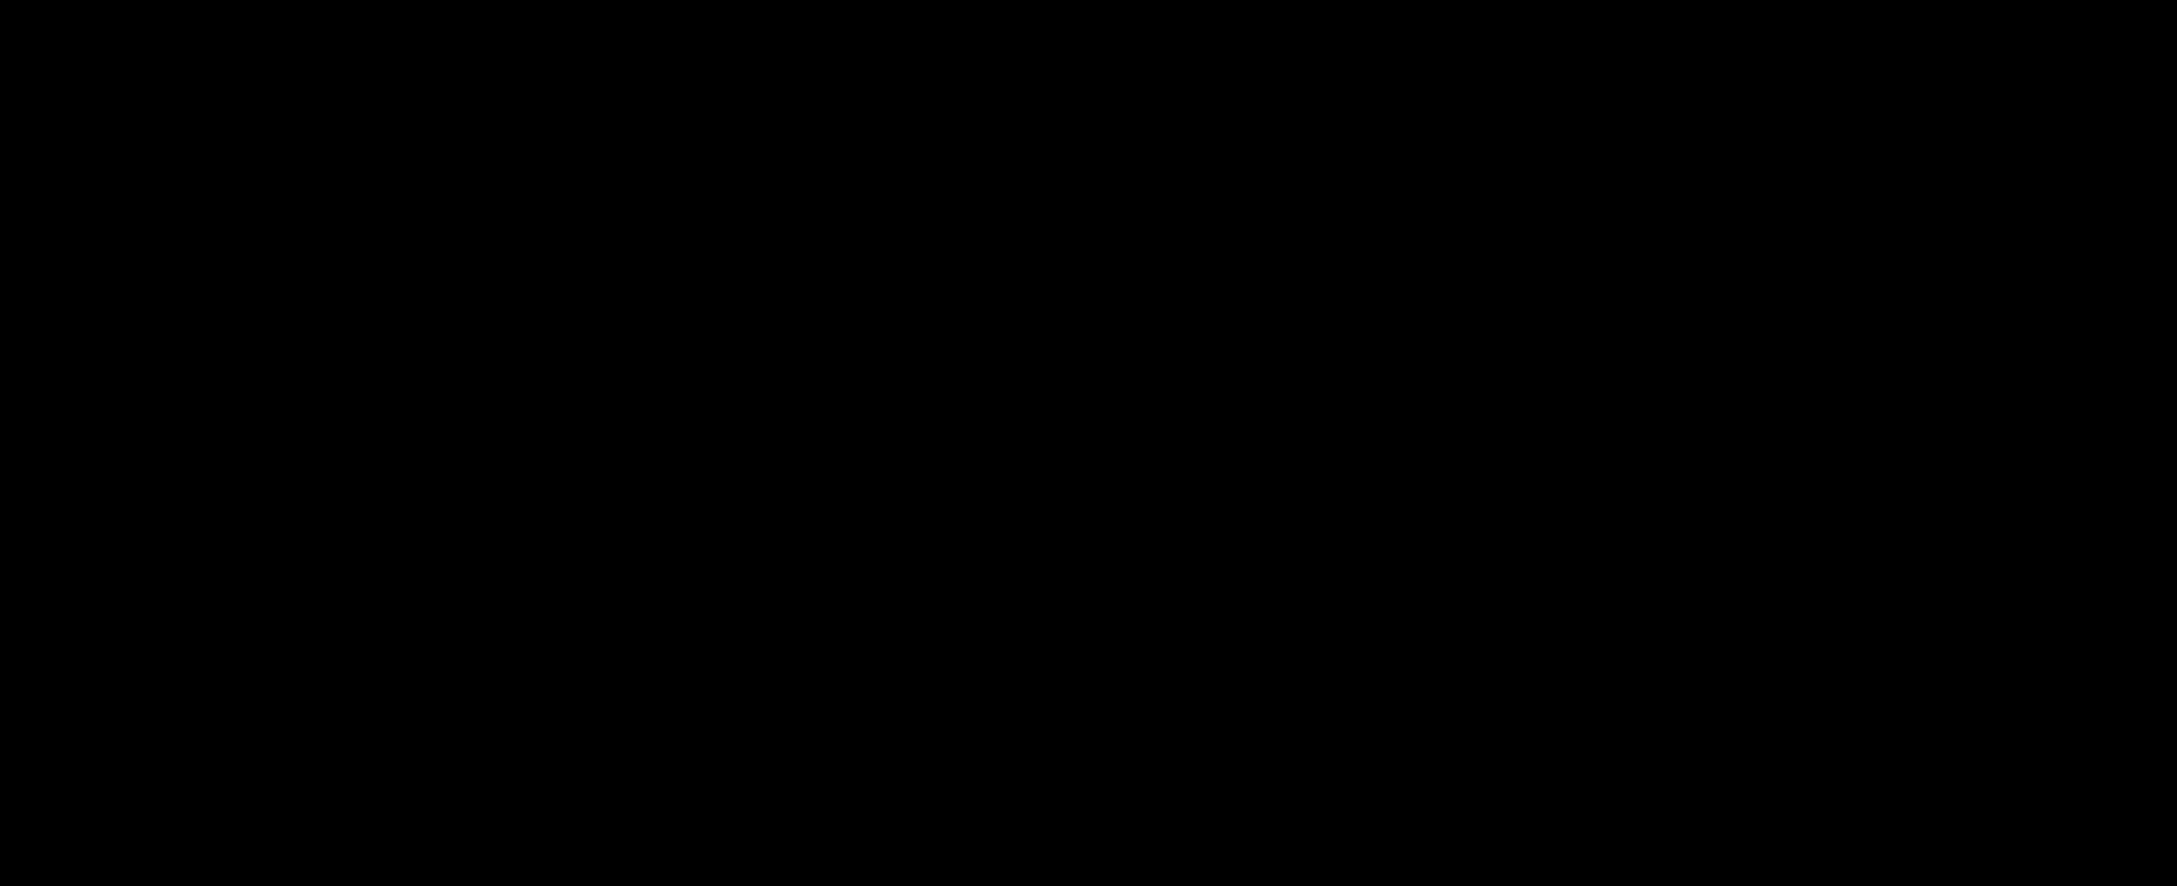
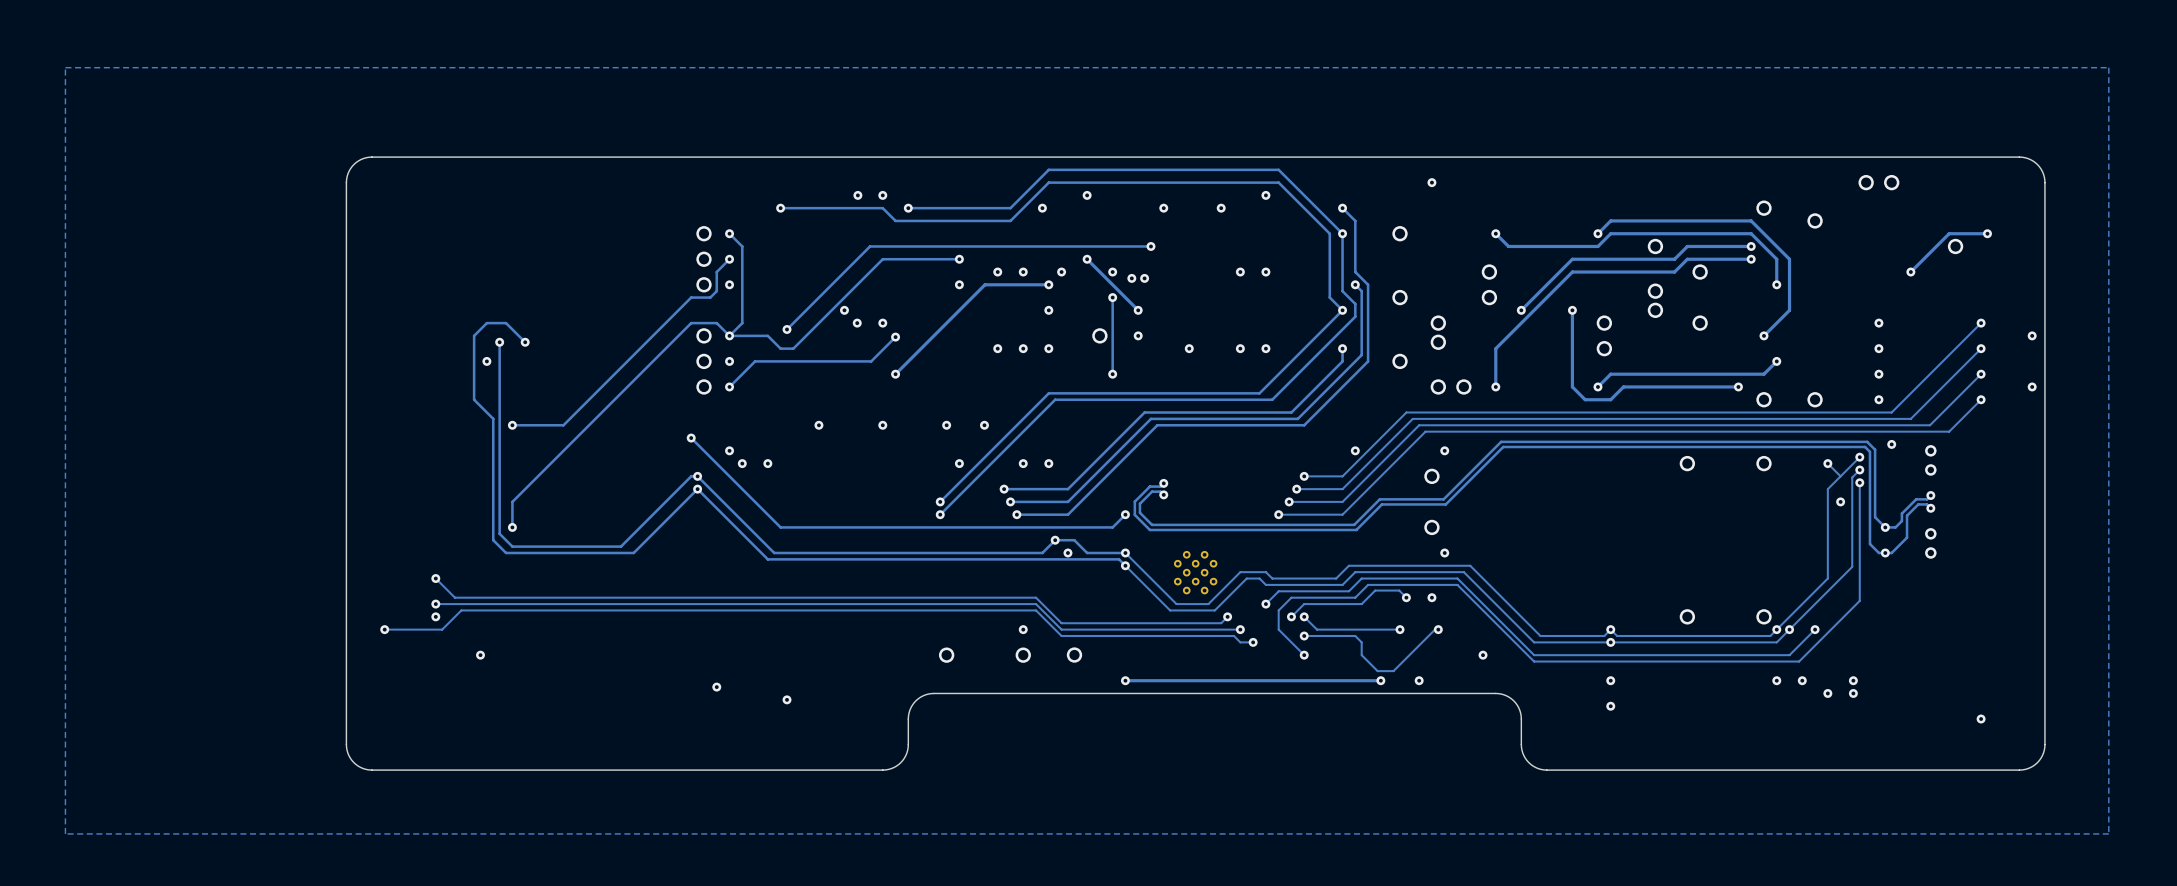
zone outline: none -> (2108, 67) (2108, 833) (65, 833) (65, 67) (2108, 67)
board edge: none -> (2019, 157) (363, 158) (351, 166) (346, 182) (347, 752) (356, 764) (371, 770) (882, 770) (893, 767) (904, 758) (908, 747) (909, 710) (917, 699) (931, 693) (1495, 693) (1509, 697) (1517, 705) (1521, 716) (1522, 752) (1530, 764) (1544, 769) (2027, 768) (2039, 760) (2044, 744) (2044, 182) (2043, 174) (2037, 164) (2030, 159) (2019, 157)
via: none -> (1431, 182)
via: none -> (1866, 182)
via: none -> (1891, 182)
via: none -> (857, 195)
via: none -> (882, 195)
via: none -> (1087, 195)
via: none -> (1265, 195)
track: none -> (780, 208) (882, 208) (895, 220) (1010, 220) (1048, 182) (1278, 182) (1329, 233) (1329, 297) (1342, 310) (1259, 393) (1048, 393) (940, 501)
via: none -> (780, 208)
track: none -> (908, 208) (1010, 208) (1048, 169) (1278, 169) (1342, 233) (1342, 291) (1355, 303) (1355, 316) (1272, 399) (1055, 399) (940, 514)
via: none -> (908, 208)
via: none -> (1042, 208)
via: none -> (1163, 208)
via: none -> (1221, 208)
track: none -> (1342, 208) (1355, 220) (1355, 272) (1368, 284) (1368, 361) (1304, 425) (1157, 425) (1067, 514) (1016, 514)
via: none -> (1342, 208)
via: none -> (1763, 208)
via: none -> (1815, 220)
via: none -> (703, 233)
track: none -> (729, 233) (742, 246) (742, 323) (729, 335)
via: none -> (729, 233)
via: none -> (1342, 233)
via: none -> (1400, 233)
track: none -> (1495, 233) (1508, 246) (1597, 246) (1610, 233) (1751, 233) (1776, 259) (1776, 284)
via: none -> (1495, 233)
track: none -> (1597, 233) (1610, 220) (1751, 220) (1789, 259) (1789, 310) (1763, 335)
via: none -> (1597, 233)
track: none -> (1987, 233) (1949, 233) (1910, 272)
via: none -> (1987, 233)
track: none -> (1150, 246) (870, 246) (787, 329)
via: none -> (1150, 246)
via: none -> (1655, 246)
track: none -> (1751, 246) (1687, 246) (1674, 259) (1572, 259) (1521, 310)
via: none -> (1751, 246)
via: none -> (1955, 246)
via: none -> (703, 259)
track: none -> (729, 259) (716, 272) (716, 291) (710, 297) (691, 297) (563, 425) (512, 425)
via: none -> (729, 259)
track: none -> (959, 259) (882, 259) (793, 348) (780, 348) (767, 335) (729, 335)
via: none -> (959, 259)
track: none -> (1087, 259) (1138, 310)
via: none -> (1087, 259)
track: none -> (1751, 259) (1687, 259) (1674, 272) (1572, 272) (1495, 348) (1495, 386)
via: none -> (1751, 259)
via: none -> (997, 272)
via: none -> (1023, 272)
via: none -> (1061, 272)
via: none -> (1112, 272)
via: none -> (1240, 272)
via: none -> (1265, 272)
via: none -> (1489, 272)
via: none -> (1700, 272)
via: none -> (1910, 272)
via: none -> (1131, 278)
via: none -> (1144, 278)
via: none -> (703, 284)
via: none -> (729, 284)
via: none -> (959, 284)
track: none -> (1048, 284) (984, 284) (895, 374)
via: none -> (1048, 284)
track: none -> (1355, 284) (1361, 291) (1361, 355) (1297, 418) (1150, 418) (1067, 501) (1010, 501)
via: none -> (1355, 284)
via: none -> (1776, 284)
via: none -> (1655, 291)
track: none -> (1112, 297) (1112, 374)
via: none -> (1112, 297)
via: none -> (1400, 297)
via: none -> (1489, 297)
via: none -> (844, 310)
via: none -> (1048, 310)
via: none -> (1138, 310)
via: none -> (1342, 310)
via: none -> (1521, 310)
track: none -> (1572, 310) (1572, 386) (1585, 399) (1610, 399) (1623, 386) (1738, 386)
via: none -> (1572, 310)
via: none -> (1655, 310)
via: none -> (857, 323)
via: none -> (882, 323)
via: none -> (1438, 323)
via: none -> (1604, 323)
via: none -> (1700, 323)
via: none -> (1878, 323)
track: none -> (1981, 323) (1891, 412) (1406, 412) (1342, 476) (1304, 476)
via: none -> (1981, 323)
via: none -> (787, 329)
via: none -> (703, 335)
track: none -> (729, 335) (716, 323) (691, 323) (512, 501) (512, 527)
via: none -> (729, 335)
via: none -> (1099, 335)
via: none -> (1138, 335)
via: none -> (1763, 335)
via: none -> (2032, 335)
track: none -> (895, 337) (871, 361) (755, 361) (729, 386)
via: none -> (895, 337)
track: none -> (499, 342) (499, 533) (512, 546) (620, 546) (691, 476) (697, 476) (774, 552) (1042, 552) (1055, 540) (1074, 540) (1087, 552) (1125, 552) (1176, 604) (1208, 604) (1240, 572) (1265, 572) (1272, 578) (1336, 578) (1348, 565) (1470, 565) (1540, 636) (1604, 636) (1610, 629) (1617, 636) (1770, 636) (1827, 578) (1827, 489) (1859, 457)
via: none -> (499, 342)
track: none -> (525, 342) (506, 323) (486, 323) (474, 335) (474, 399) (493, 418) (493, 540) (506, 552) (633, 552) (697, 489) (767, 559) (1119, 559) (1170, 610) (1214, 610) (1246, 578) (1259, 578) (1265, 584) (1342, 584) (1355, 572) (1463, 572) (1534, 642) (1776, 642) (1852, 566) (1852, 477) (1859, 469)
via: none -> (525, 342)
via: none -> (1438, 342)
via: none -> (997, 348)
via: none -> (1023, 348)
via: none -> (1048, 348)
via: none -> (1189, 348)
via: none -> (1240, 348)
via: none -> (1265, 348)
track: none -> (1342, 348) (1342, 361) (1291, 412) (1144, 412) (1067, 489) (1004, 489)
via: none -> (1342, 348)
via: none -> (1604, 348)
via: none -> (1878, 348)
track: none -> (1981, 348) (1910, 418) (1412, 418) (1342, 489) (1296, 489)
via: none -> (1981, 348)
via: none -> (486, 361)
via: none -> (703, 361)
via: none -> (729, 361)
via: none -> (1400, 361)
track: none -> (1776, 361) (1763, 374) (1610, 374) (1597, 386)
via: none -> (1776, 361)
via: none -> (895, 374)
via: none -> (1112, 374)
via: none -> (1878, 374)
track: none -> (1981, 374) (1930, 425) (1419, 425) (1342, 501) (1289, 501)
via: none -> (1981, 374)
via: none -> (703, 386)
via: none -> (729, 386)
via: none -> (1438, 386)
via: none -> (1463, 386)
via: none -> (1495, 386)
via: none -> (1597, 386)
via: none -> (1738, 386)
via: none -> (2032, 386)
via: none -> (1763, 399)
via: none -> (1815, 399)
via: none -> (1878, 399)
track: none -> (1981, 399) (1949, 431) (1425, 431) (1342, 514) (1278, 514)
via: none -> (1981, 399)
via: none -> (512, 425)
via: none -> (818, 425)
via: none -> (882, 425)
via: none -> (946, 425)
via: none -> (984, 425)
track: none -> (691, 438) (780, 527) (1112, 527) (1125, 514)
via: none -> (691, 438)
via: none -> (1891, 444)
via: none -> (729, 450)
via: none -> (1355, 450)
via: none -> (1444, 450)
via: none -> (1930, 450)
via: none -> (1859, 457)
via: none -> (742, 463)
via: none -> (767, 463)
via: none -> (959, 463)
via: none -> (1023, 463)
via: none -> (1048, 463)
via: none -> (1687, 463)
via: none -> (1763, 463)
track: none -> (1827, 463) (1840, 476)
via: none -> (1827, 463)
via: none -> (1859, 469)
via: none -> (1930, 469)
via: none -> (697, 476)
via: none -> (1304, 476)
via: none -> (1431, 476)
track: none -> (1859, 482) (1859, 600) (1799, 661) (1534, 661) (1457, 584) (1368, 584) (1355, 597) (1291, 597) (1278, 610) (1278, 629) (1304, 655)
via: none -> (1859, 482)
track: none -> (1163, 483) (1160, 486) (1149, 486) (1134, 501) (1134, 514) (1149, 530) (1356, 530) (1381, 504) (1445, 504) (1503, 446) (1865, 446) (1869, 451) (1869, 544) (1878, 552) (1891, 552) (1907, 537) (1907, 515) (1918, 504) (1926, 504) (1930, 508)
via: none -> (1163, 483)
via: none -> (697, 489)
via: none -> (1004, 489)
via: none -> (1296, 489)
track: none -> (1163, 494) (1160, 491) (1152, 491) (1139, 503) (1139, 512) (1152, 524) (1354, 524) (1379, 499) (1443, 499) (1501, 441) (1867, 441) (1875, 449) (1875, 517) (1885, 527) (1895, 527) (1901, 521) (1901, 513) (1916, 499) (1926, 499) (1930, 495)
via: none -> (1163, 494)
via: none -> (1930, 495)
via: none -> (940, 501)
via: none -> (1010, 501)
via: none -> (1289, 501)
via: none -> (1840, 501)
via: none -> (1930, 508)
via: none -> (940, 514)
via: none -> (1016, 514)
via: none -> (1125, 514)
via: none -> (1278, 514)
via: none -> (512, 527)
via: none -> (1431, 527)
via: none -> (1885, 527)
via: none -> (1930, 533)
via: none -> (1055, 540)
via: none -> (1067, 552)
via: none -> (1125, 552)
via: none -> (1444, 552)
via: none -> (1885, 552)
via: none -> (1930, 552)
via: none -> (1125, 565)
part: none -> (1195, 572)
track: none -> (435, 578) (454, 597) (1036, 597) (1061, 623) (1221, 623) (1227, 616)
via: none -> (435, 578)
track: none -> (1406, 597) (1399, 590) (1375, 590) (1361, 604) (1304, 604) (1291, 616)
via: none -> (1406, 597)
via: none -> (1431, 597)
track: none -> (435, 604) (1036, 604) (1061, 629) (1240, 629)
via: none -> (435, 604)
track: none -> (1265, 604) (1278, 591) (1348, 591) (1361, 578) (1457, 578) (1534, 655) (1789, 655) (1815, 629)
via: none -> (1265, 604)
via: none -> (435, 616)
via: none -> (1227, 616)
via: none -> (1291, 616)
track: none -> (1304, 616) (1317, 629) (1400, 629)
via: none -> (1304, 616)
via: none -> (1687, 616)
via: none -> (1763, 616)
track: none -> (384, 629) (442, 629) (461, 610) (1036, 610) (1061, 636) (1233, 636) (1240, 642) (1253, 642)
via: none -> (384, 629)
via: none -> (1023, 629)
via: none -> (1240, 629)
via: none -> (1400, 629)
track: none -> (1438, 629) (1435, 629) (1393, 671) (1377, 671) (1361, 655) (1361, 642) (1355, 636) (1304, 636)
via: none -> (1438, 629)
via: none -> (1610, 629)
via: none -> (1776, 629)
via: none -> (1789, 629)
via: none -> (1815, 629)
via: none -> (1304, 636)
via: none -> (1253, 642)
via: none -> (1610, 642)
via: none -> (480, 655)
via: none -> (946, 655)
via: none -> (1023, 655)
via: none -> (1074, 655)
via: none -> (1304, 655)
via: none -> (1483, 655)
via: none -> (1125, 680)
track: none -> (1380, 680) (1125, 680)
via: none -> (1380, 680)
via: none -> (1419, 680)
via: none -> (1610, 680)
via: none -> (1776, 680)
via: none -> (1802, 680)
via: none -> (1853, 680)
via: none -> (716, 687)
via: none -> (1827, 693)
via: none -> (1853, 693)
via: none -> (787, 699)
via: none -> (1610, 706)
via: none -> (1981, 719)

